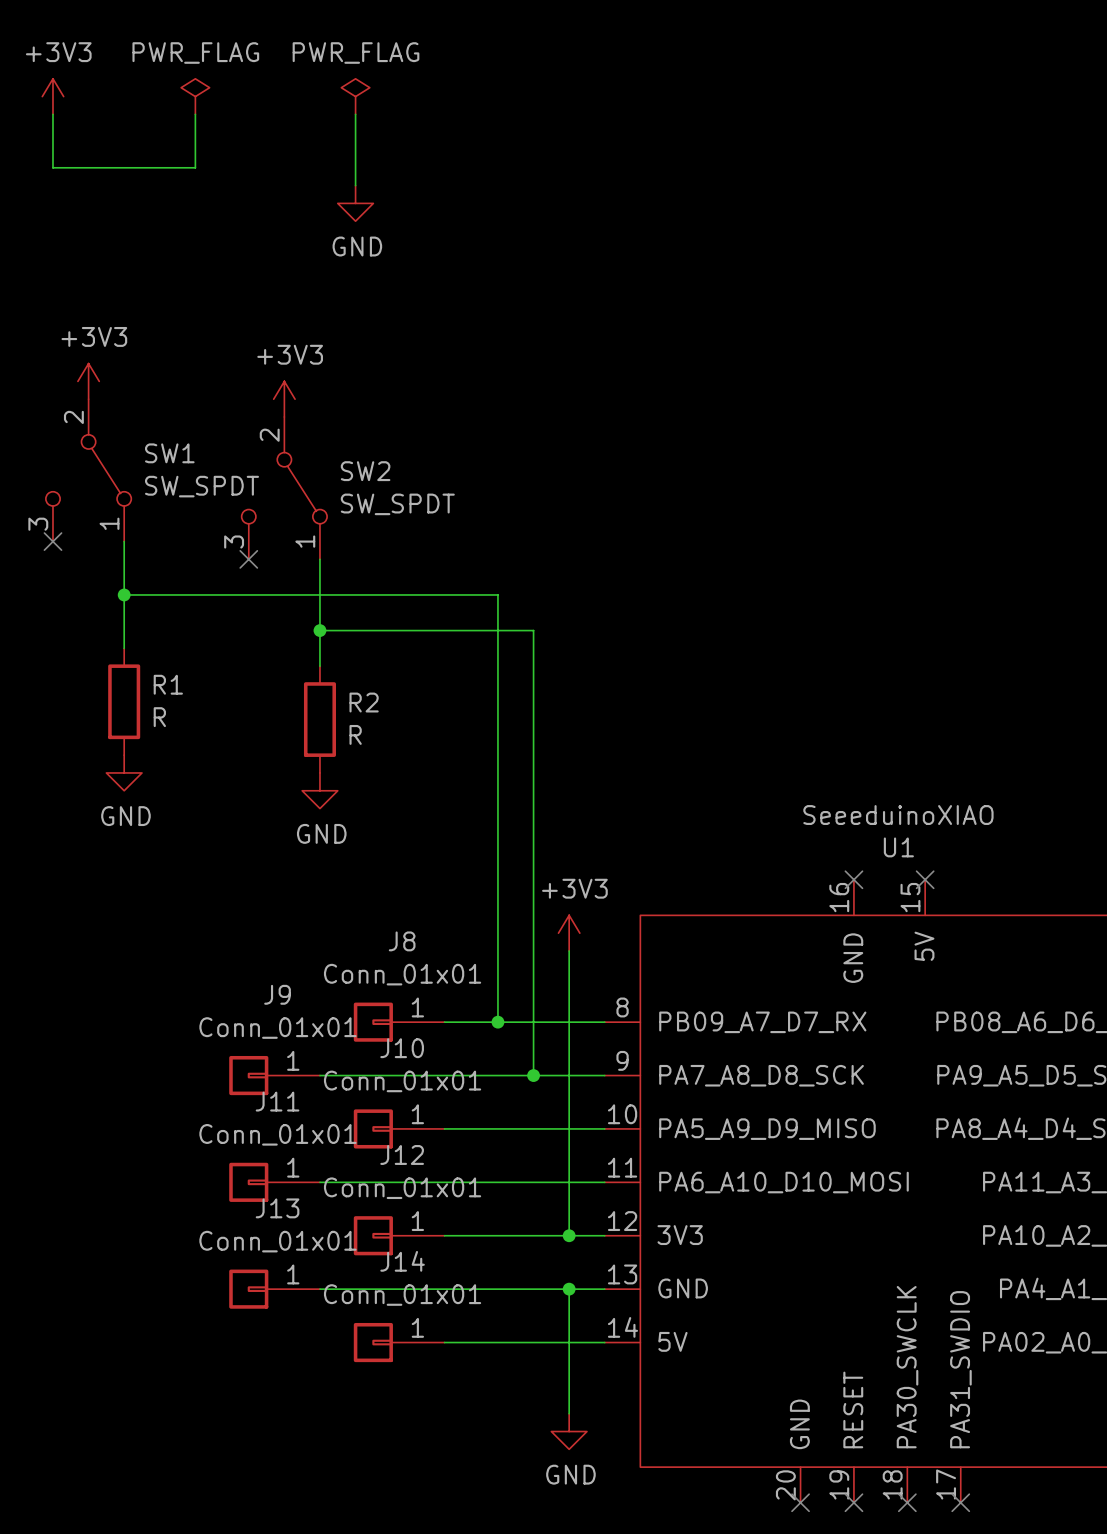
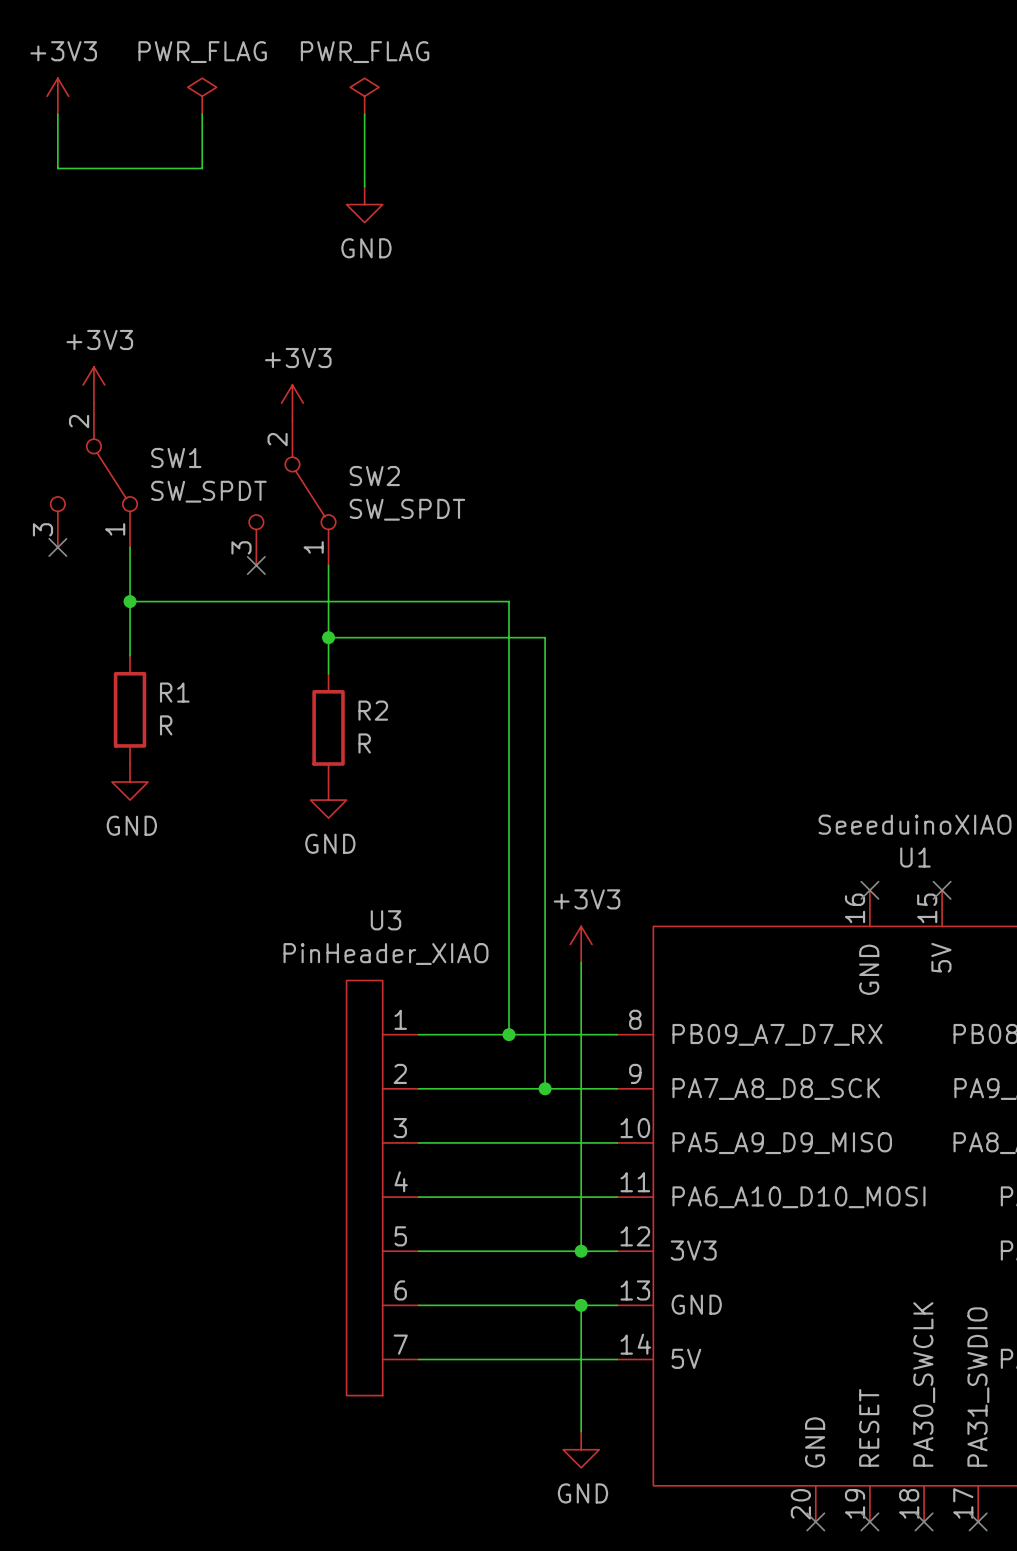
J8: Conn_01x01 (399, 1022) -> none
J9: Conn_01x01 (274, 1075) -> none
wire: (319, 1075) (408, 1075) -> none
J10: Conn_01x01 (399, 1128) -> none
U3: none -> PinHeader_XIAO (382, 1188)
J11: Conn_01x01 (274, 1182) -> none
wire: (319, 1182) (408, 1182) -> none
J12: Conn_01x01 (399, 1235) -> none
J13: Conn_01x01 (274, 1289) -> none
wire: (319, 1289) (408, 1289) -> none
J14: Conn_01x01 (399, 1342) -> none

